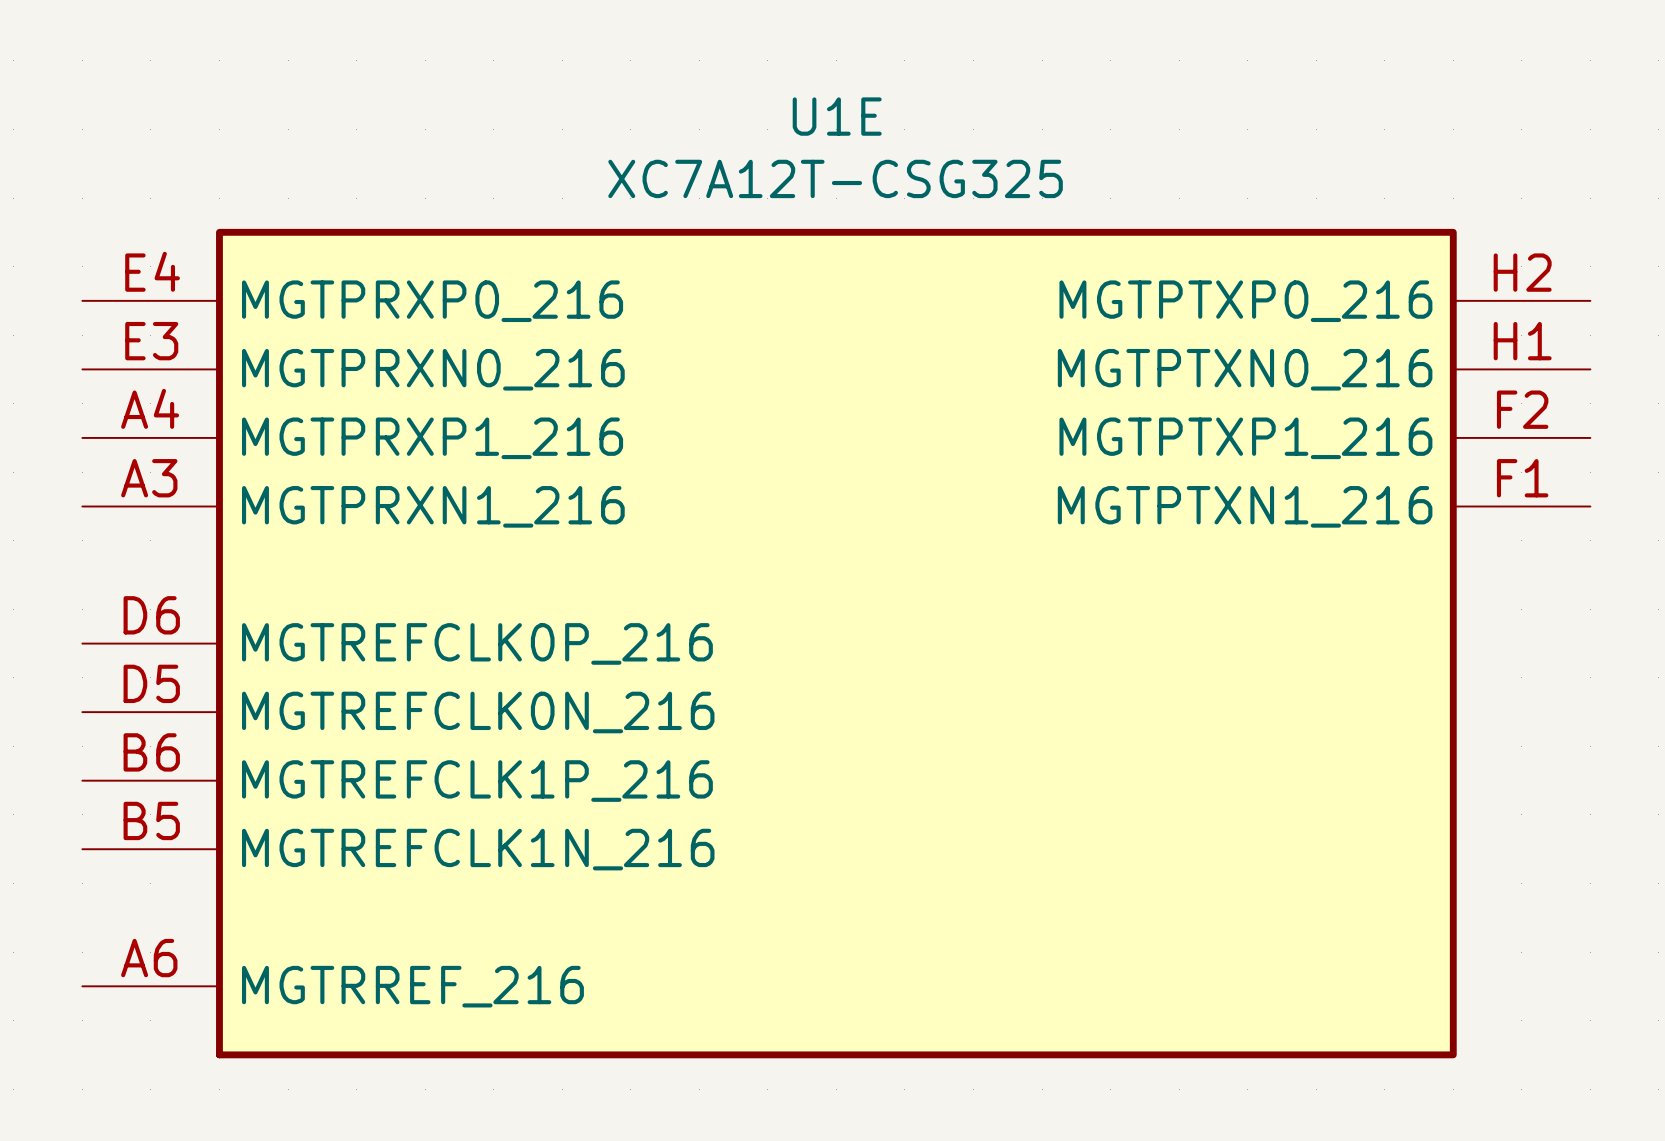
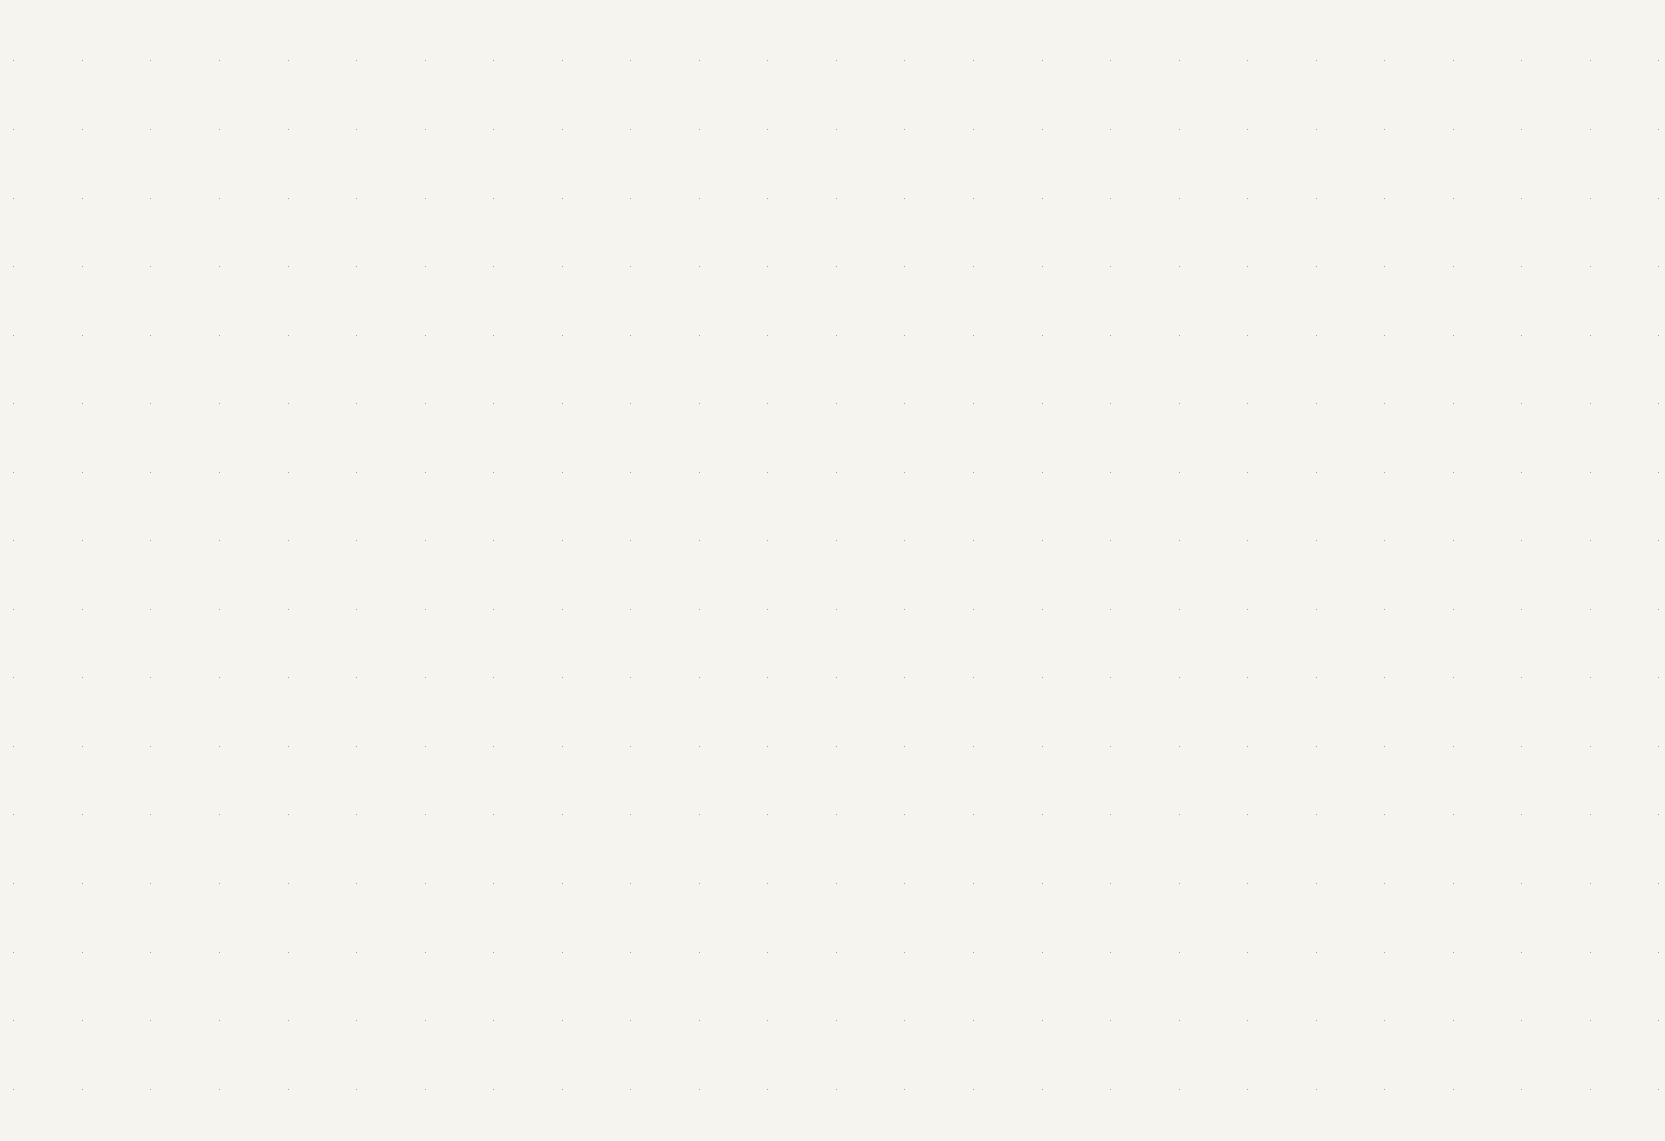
U1E: XC7A12T-CSG325 (836, 643) -> none

